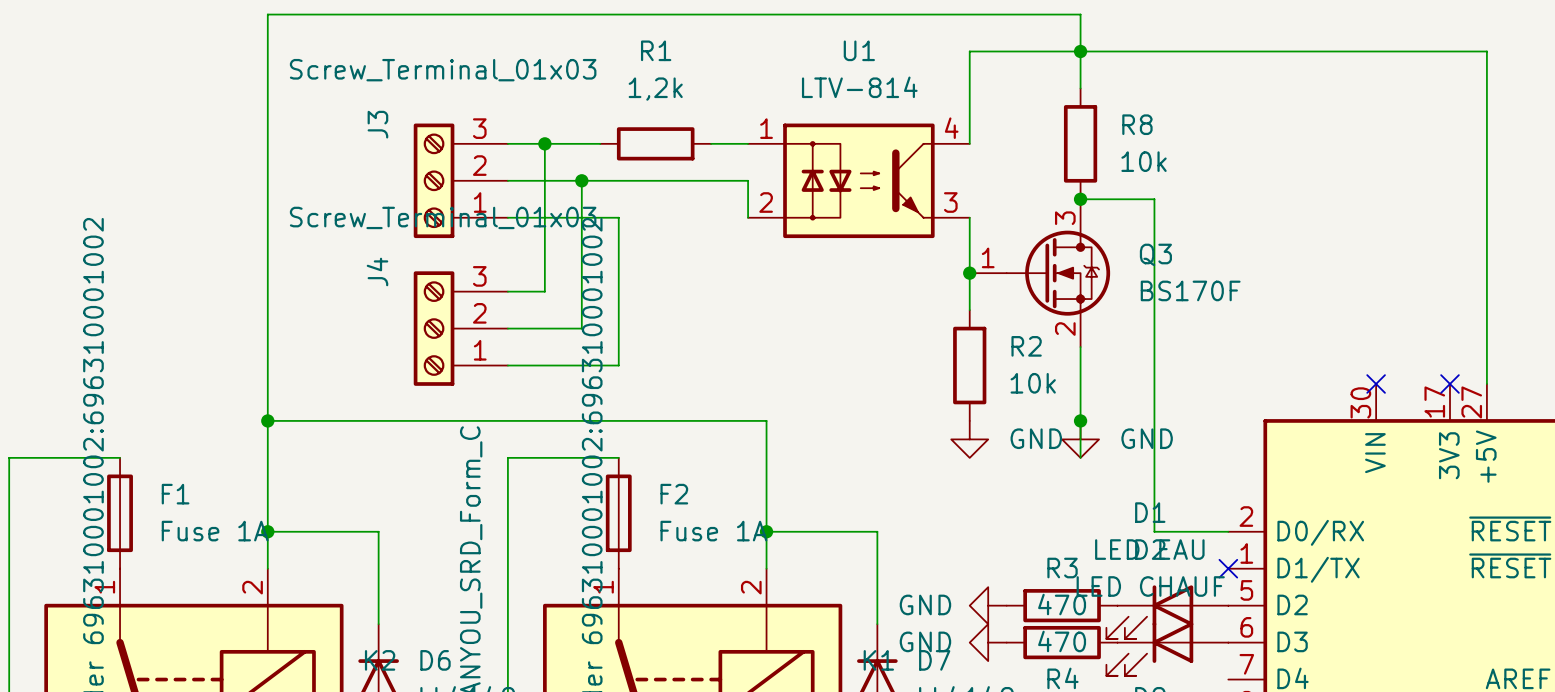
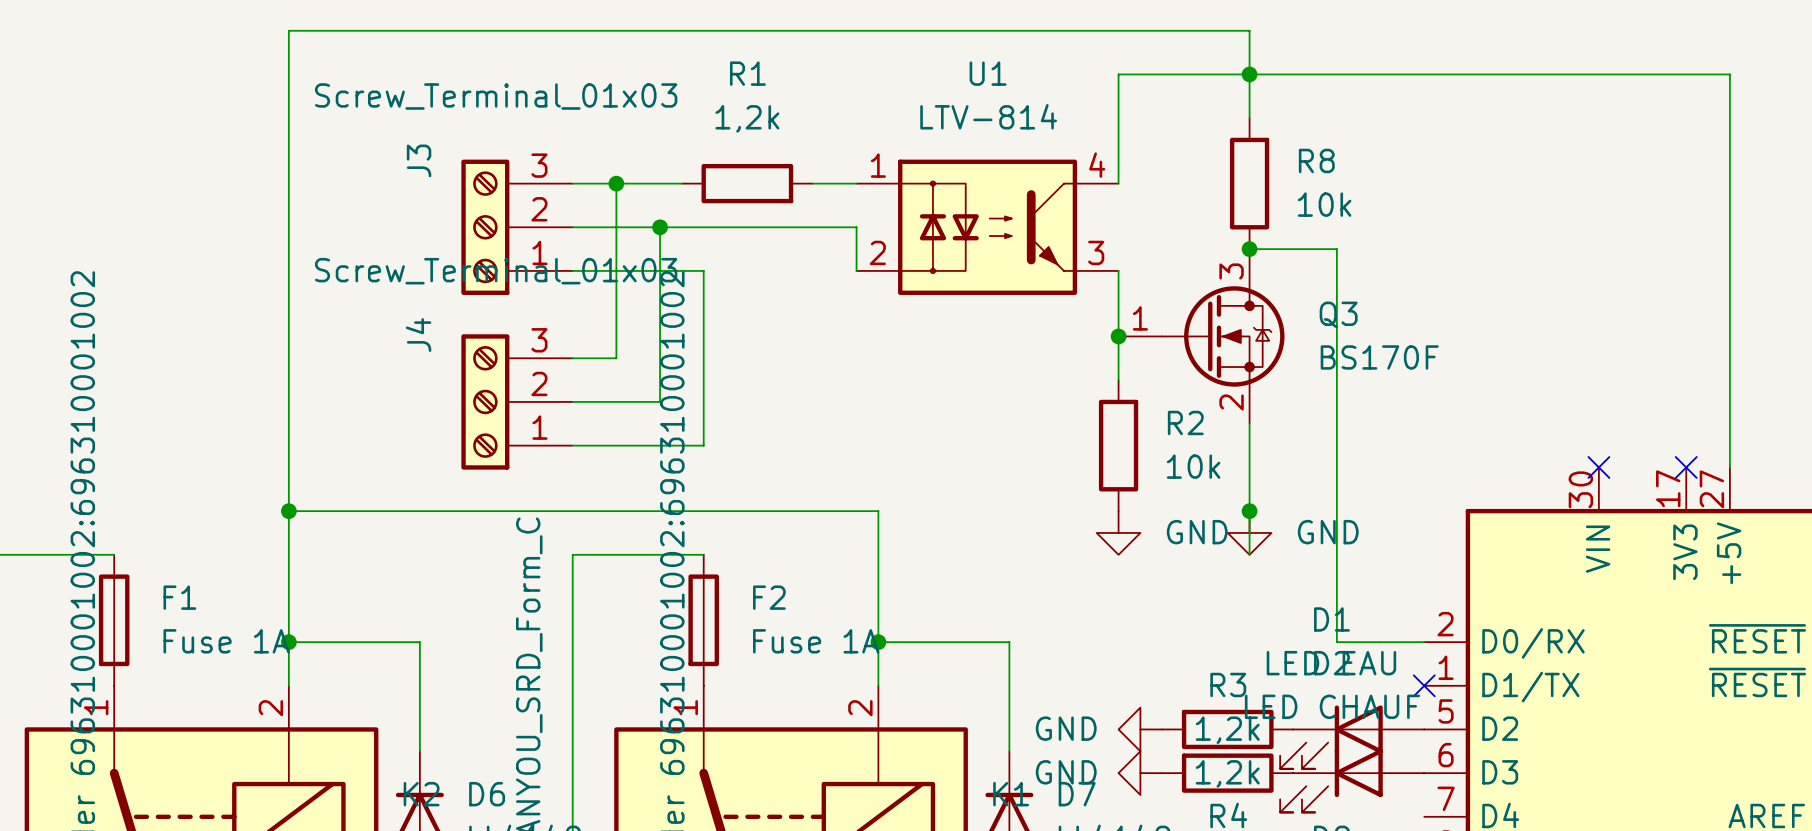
R3 value: 470 (1062, 604) -> 1,2k (1227, 730)
R4 value: 470 (1062, 641) -> 1,2k (1227, 773)

